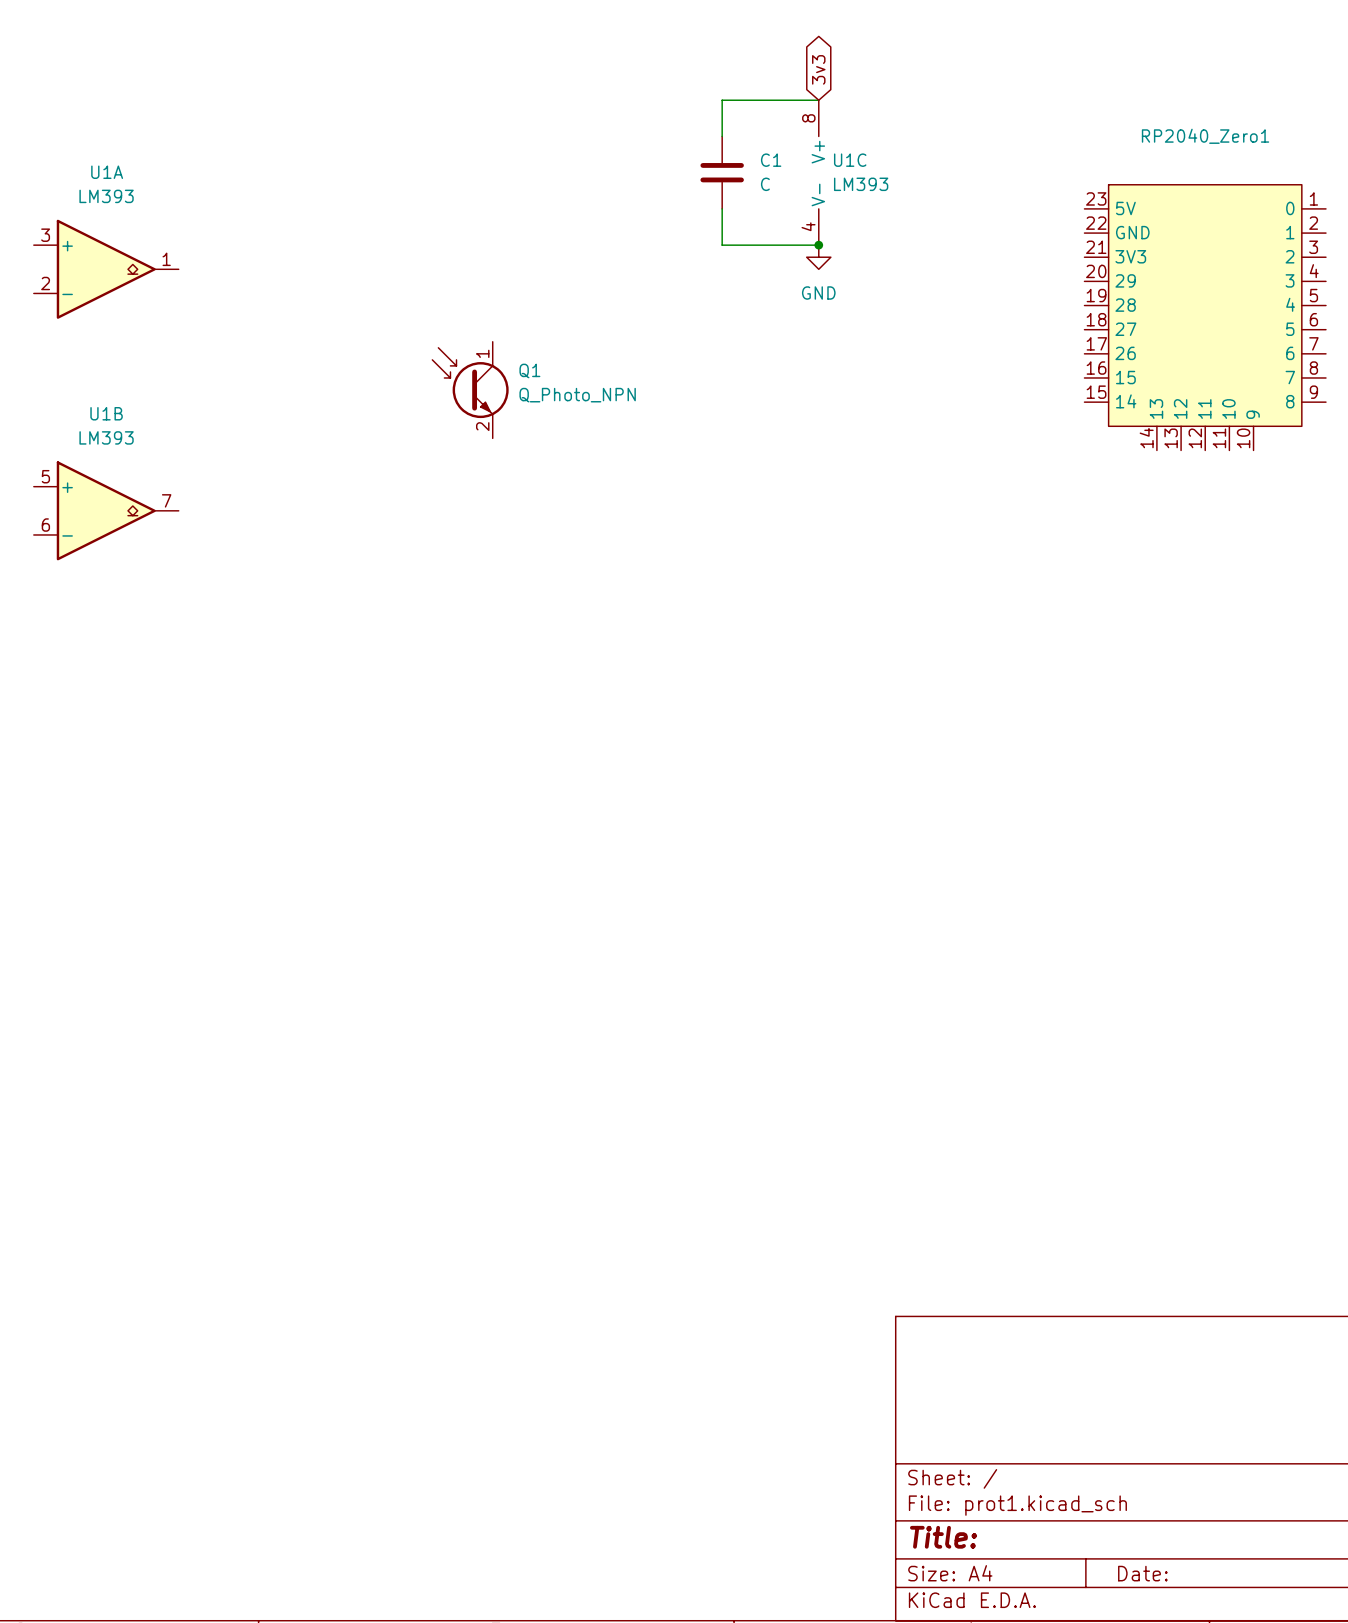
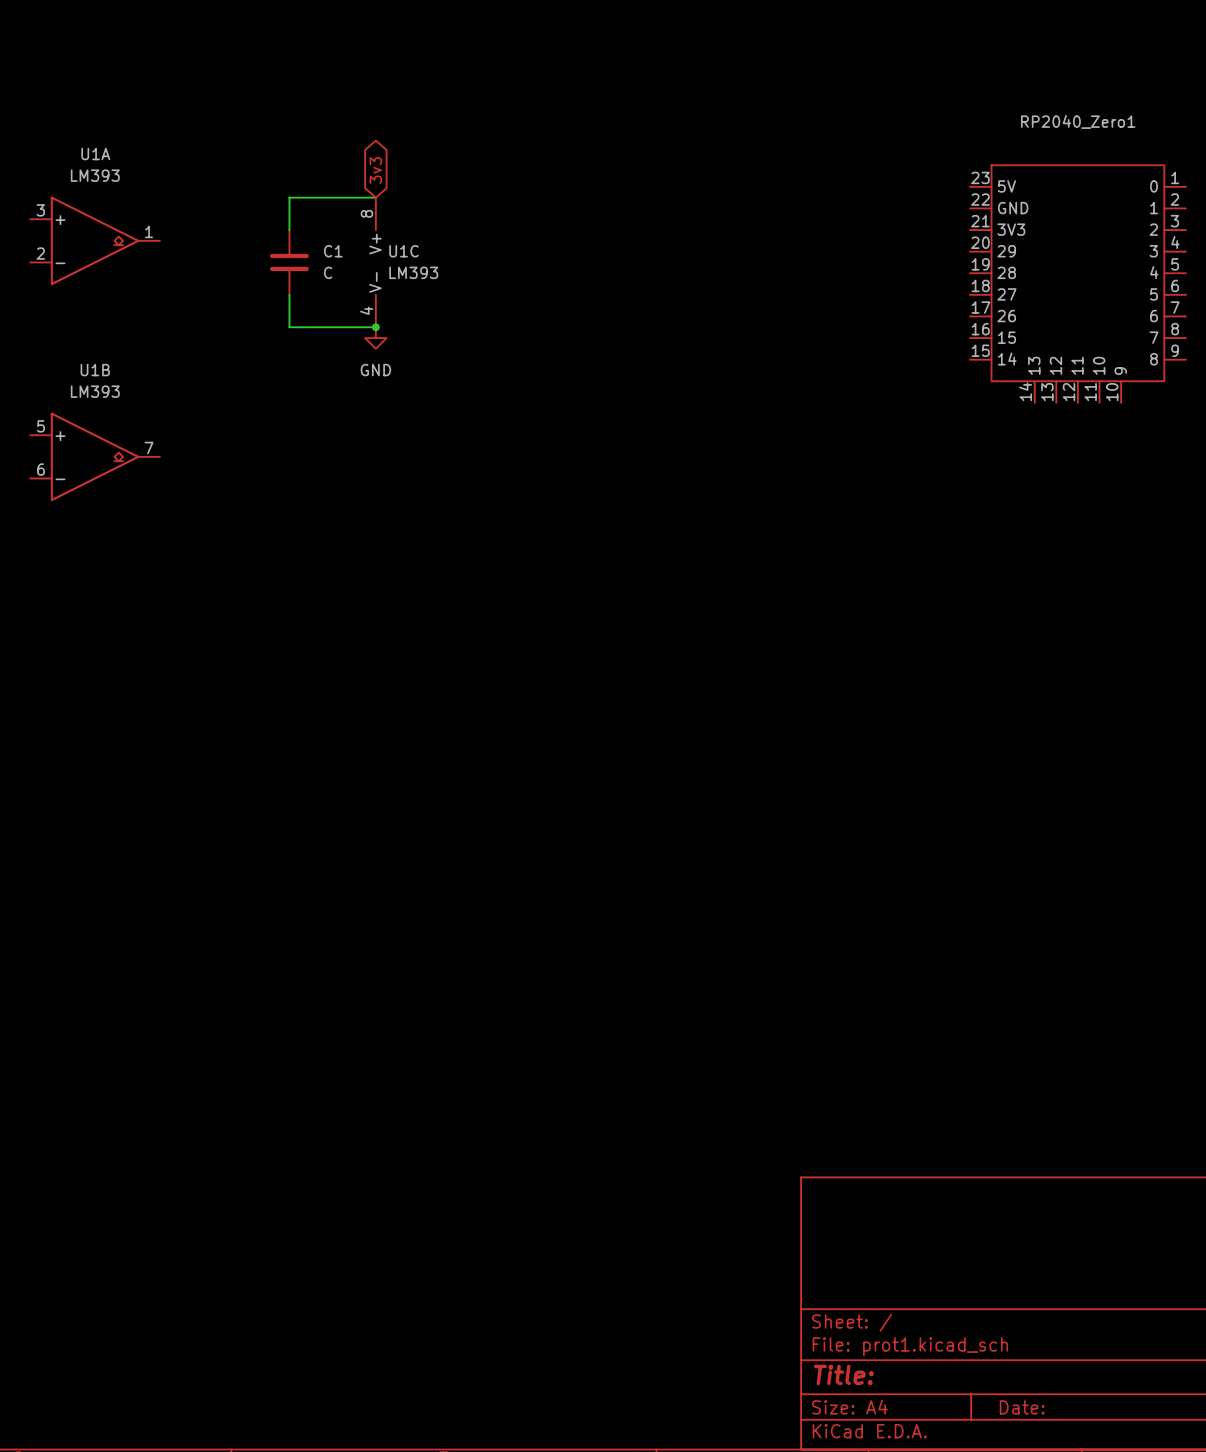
global label: 3v3 (818, 69) -> none
wire: (818, 100) (722, 100) (722, 136) -> none
C1 position: (722, 172) -> (289, 262)
U1C position: (818, 172) -> (375, 262)
global label: none -> 3v3 (375, 170)
wire: (722, 208) (722, 245) (818, 245) -> none
wire: none -> (375, 197) (289, 197) (289, 230)
junction: (818, 245) -> none
power symbol: GND (818, 257) -> none
wire: none -> (289, 294) (289, 327) (375, 327)
junction: none -> (375, 327)
power symbol: none -> GND (375, 338)
Q1: Q_Photo_NPN (470, 390) -> none

